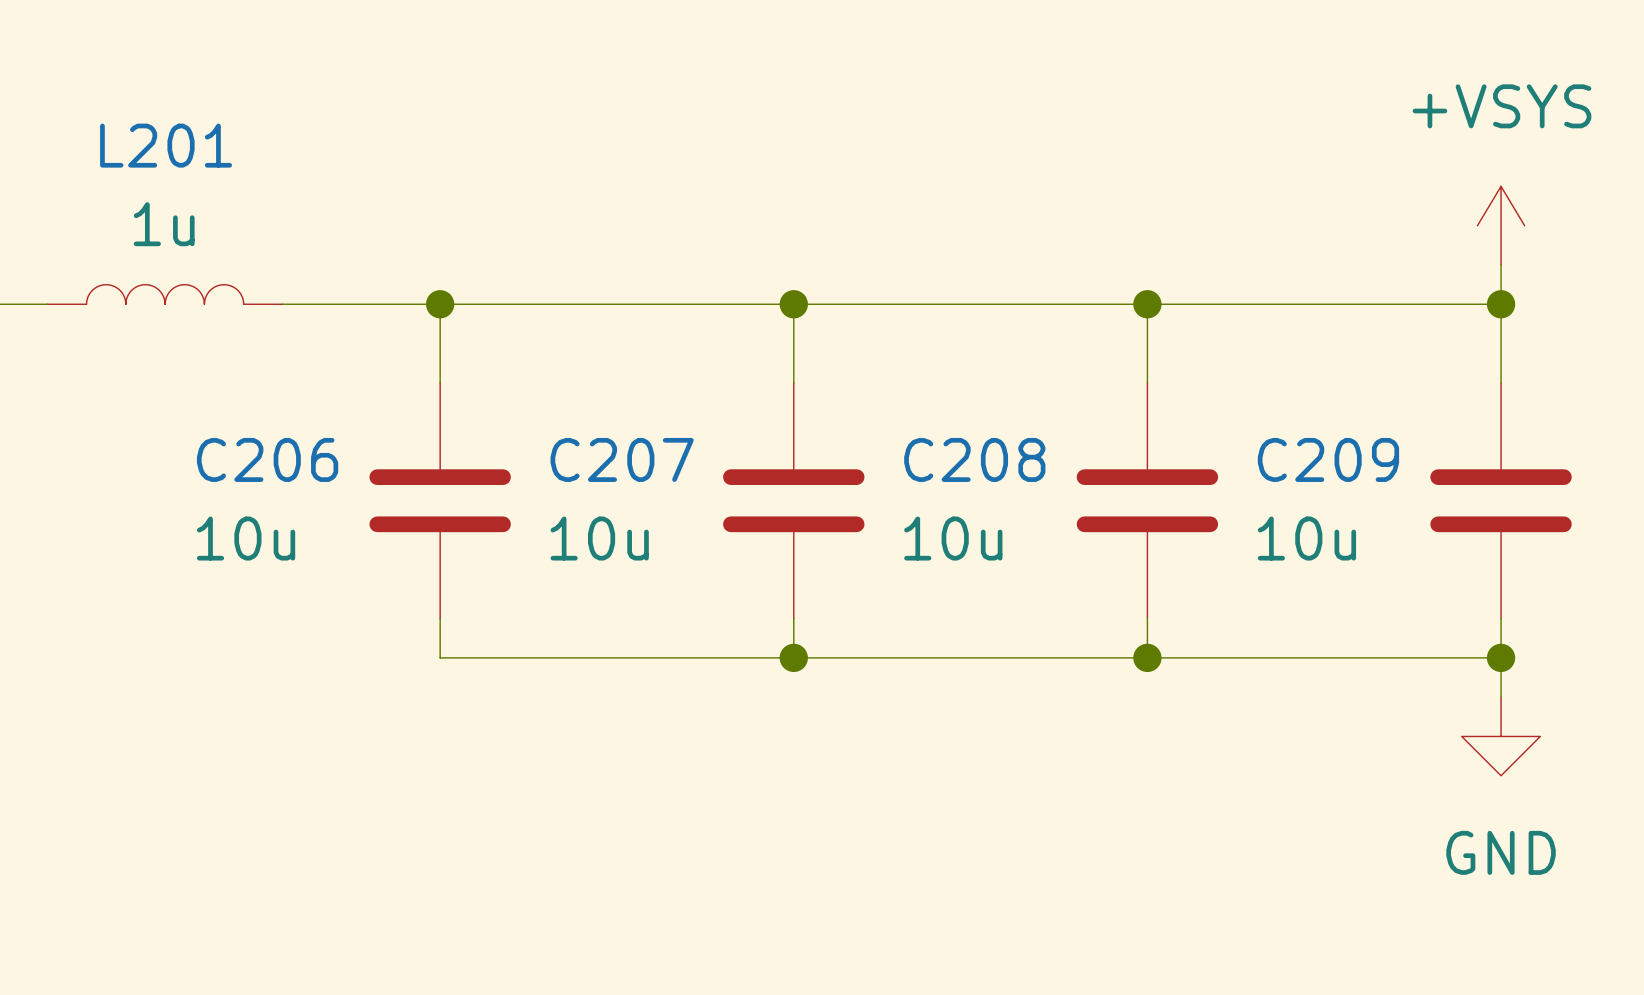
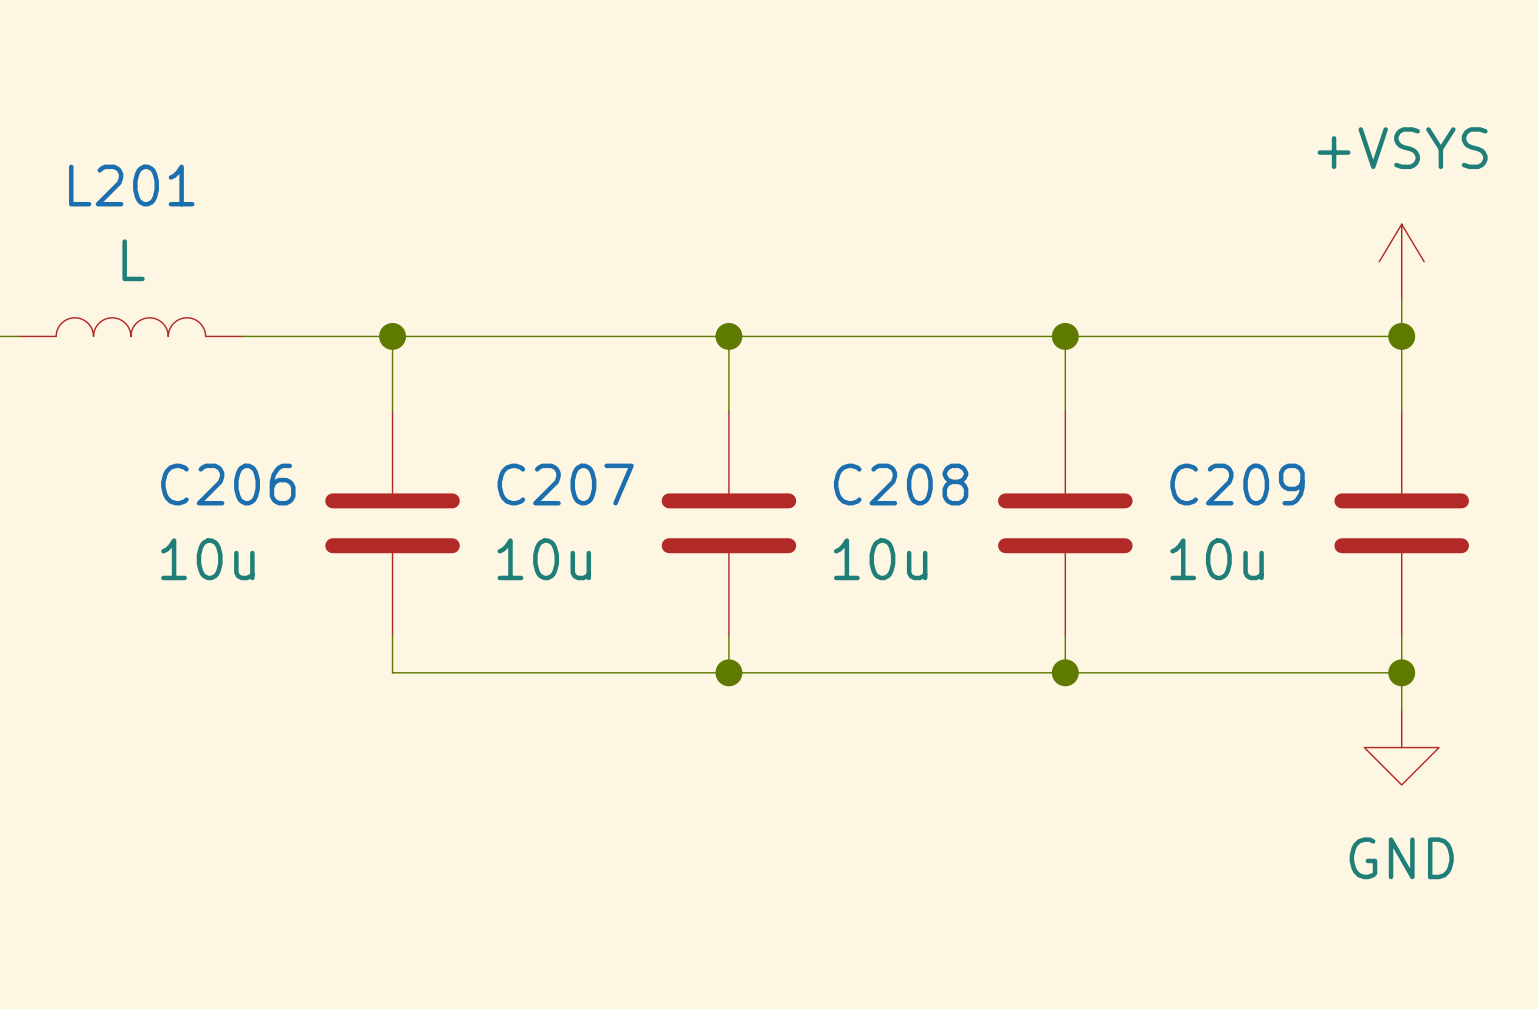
L201 value: 1u (164, 224) -> L (133, 260)

